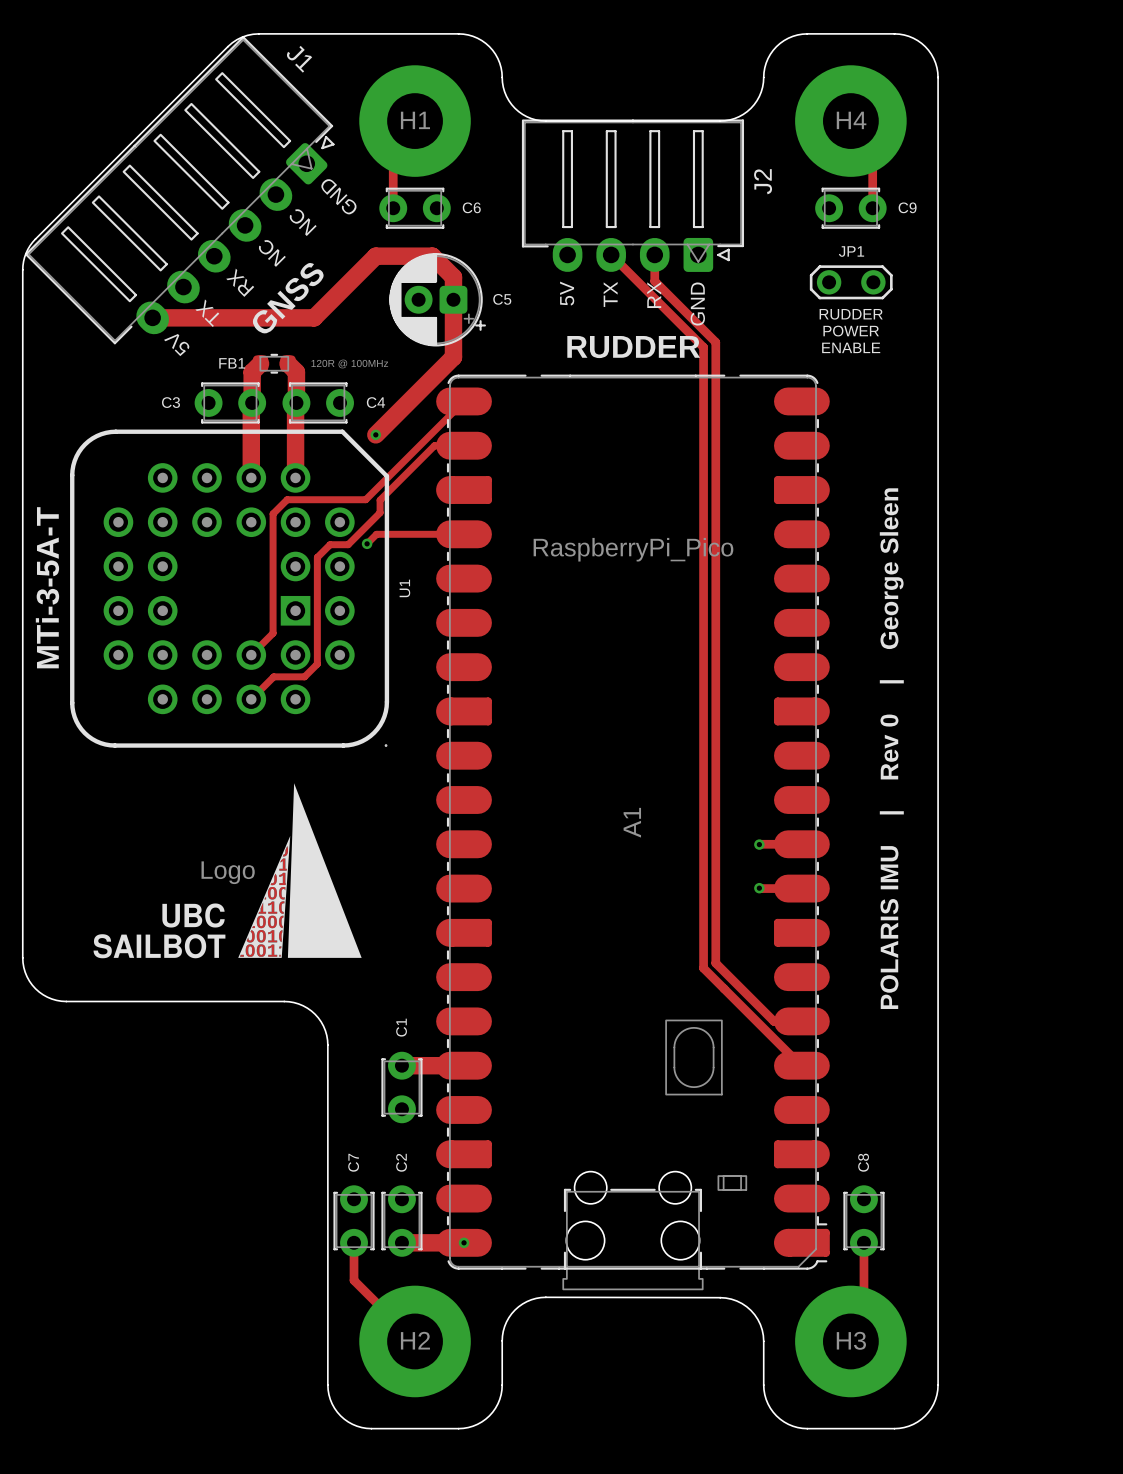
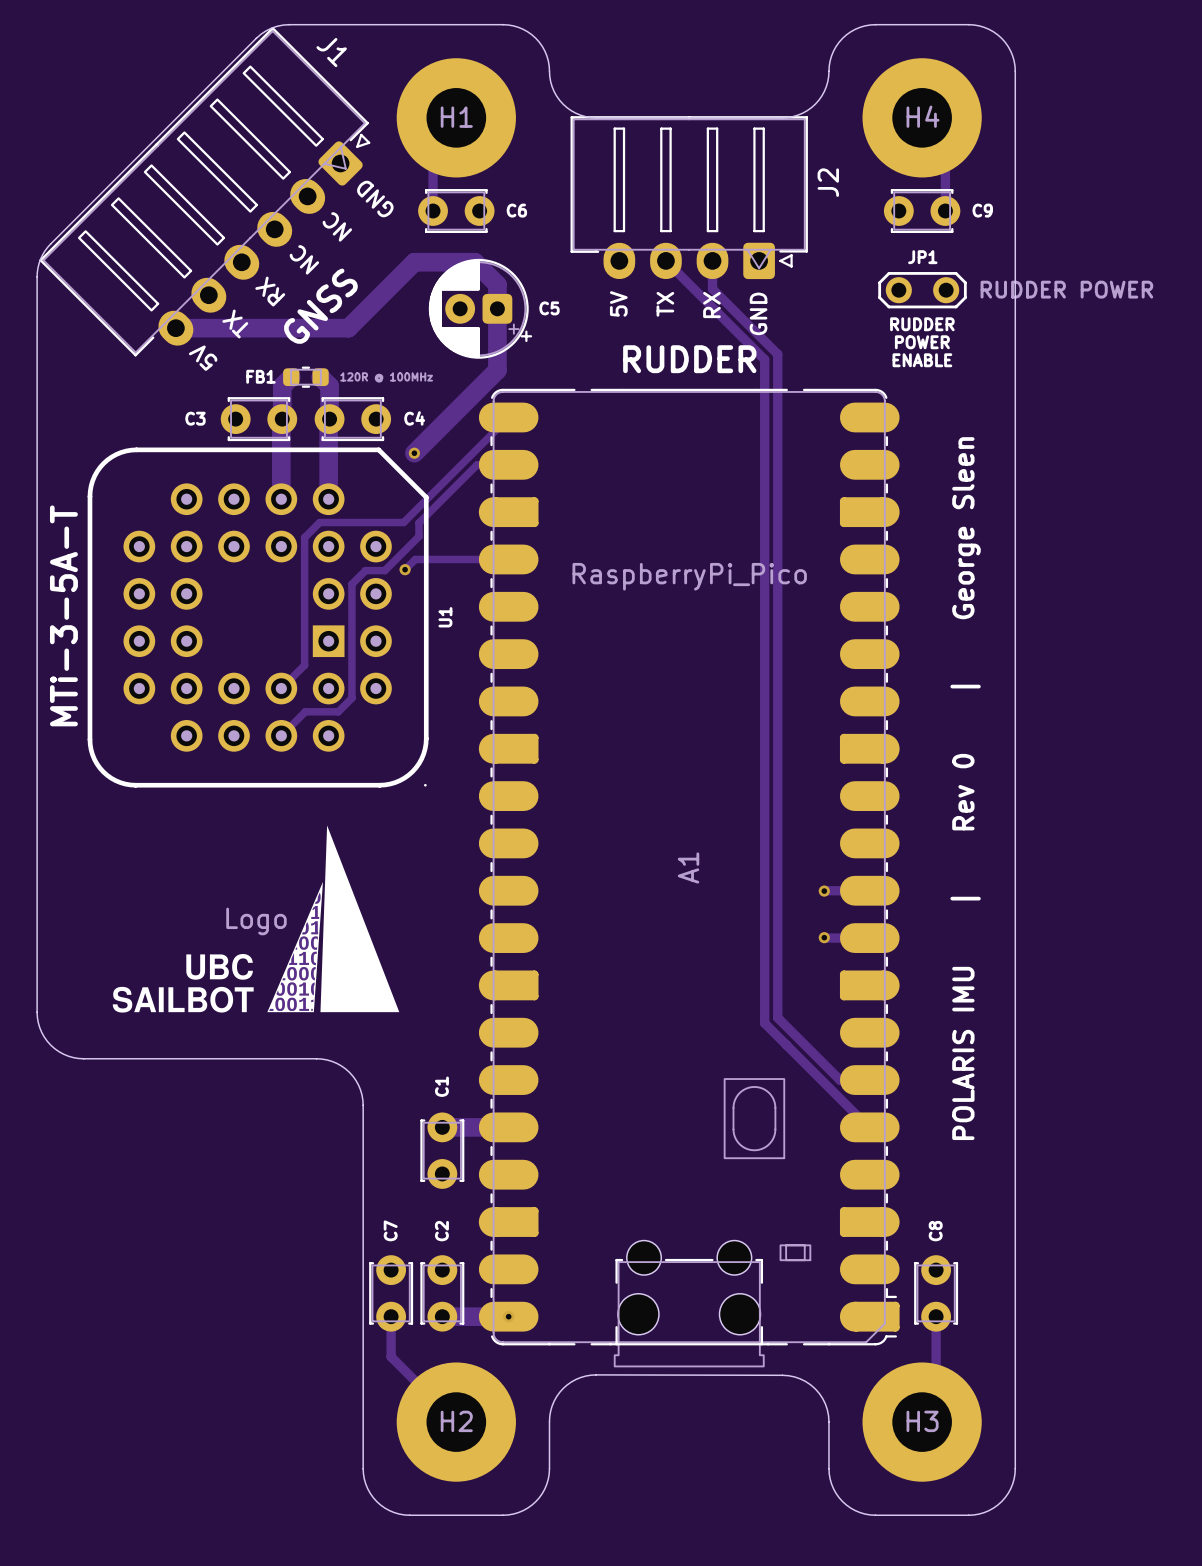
JP1 value: none -> RUDDER POWER (1066, 289)

